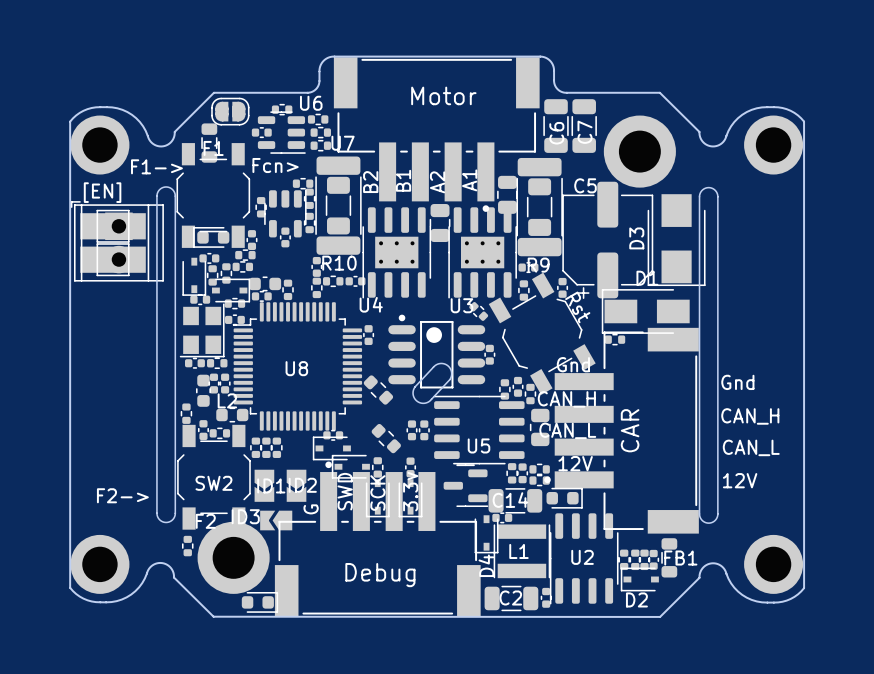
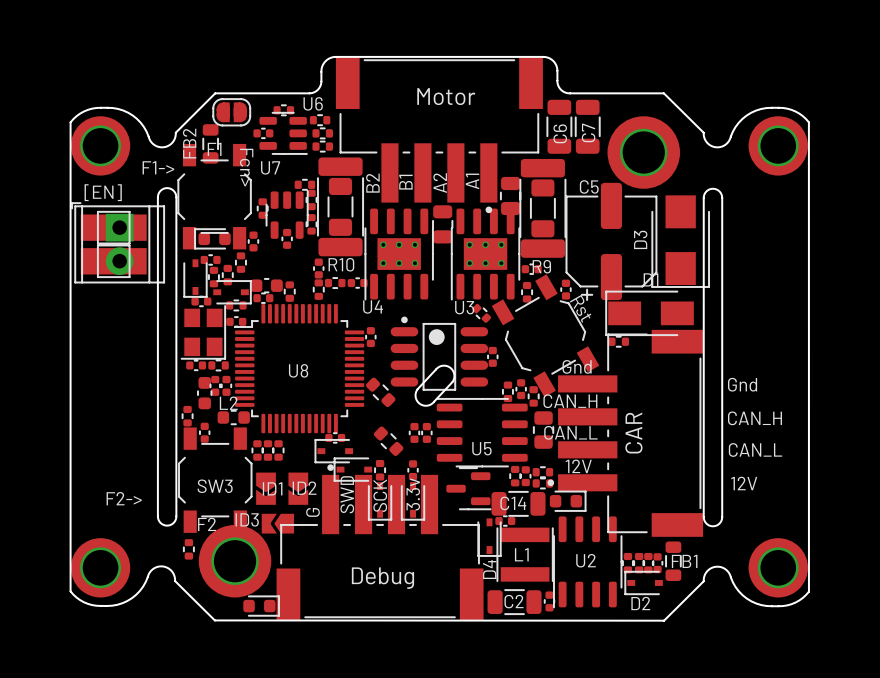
FB2 name: none -> FB2 (189, 143)
U7 name position: U7 (343, 143) -> U7 (270, 167)
part value rotation: 0° (275, 165) -> 90° clockwise (246, 167)
part: (245, 255) -> none
part: none -> (240, 262)
part: (242, 266) -> none
part: (219, 433) -> none
SW2 name: SW2 (213, 483) -> SW3 (215, 486)

